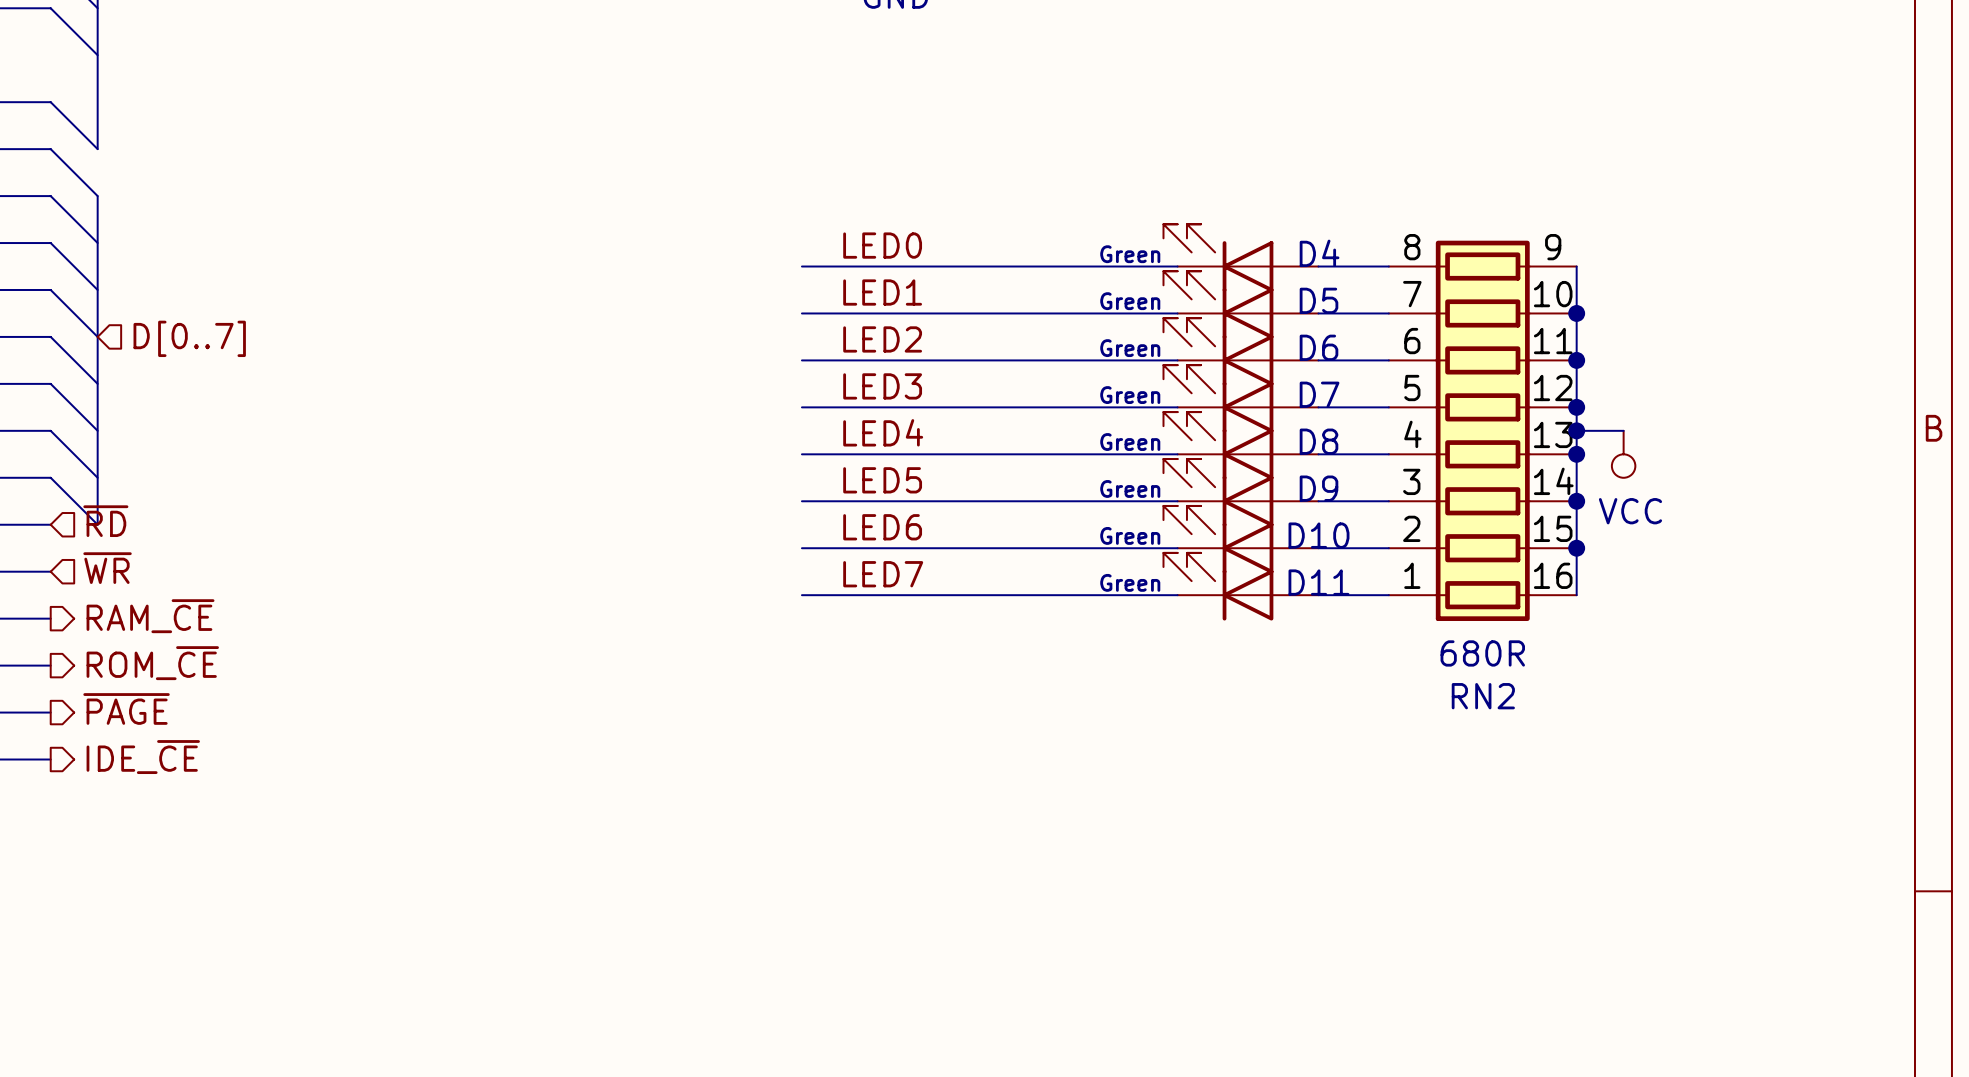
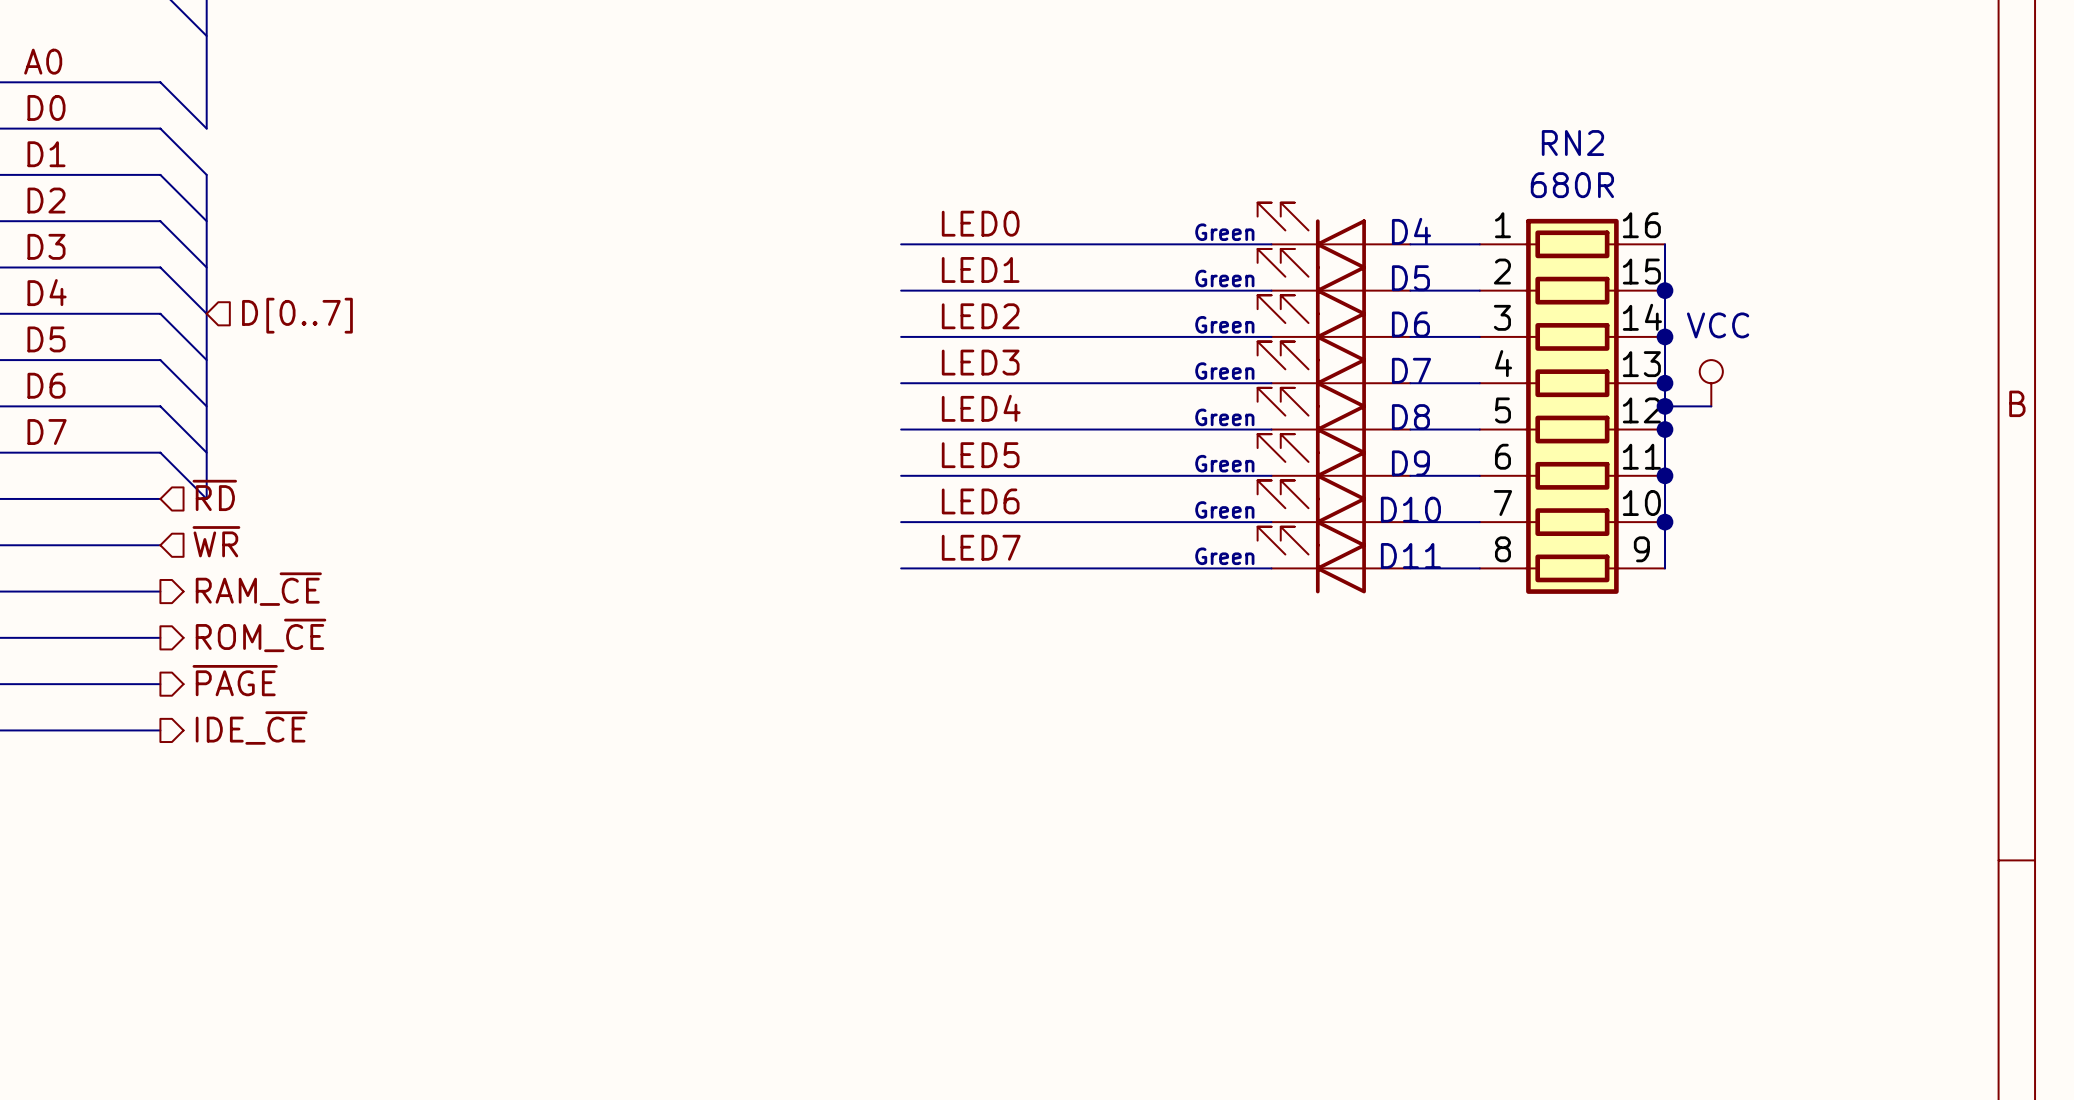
RN2 flip: as is (1482, 430) -> up-down (1572, 406)
power symbol rotation: 0° (1623, 454) -> 180° (1711, 383)
power symbol position: VCC (1623, 454) -> VCC (1711, 383)

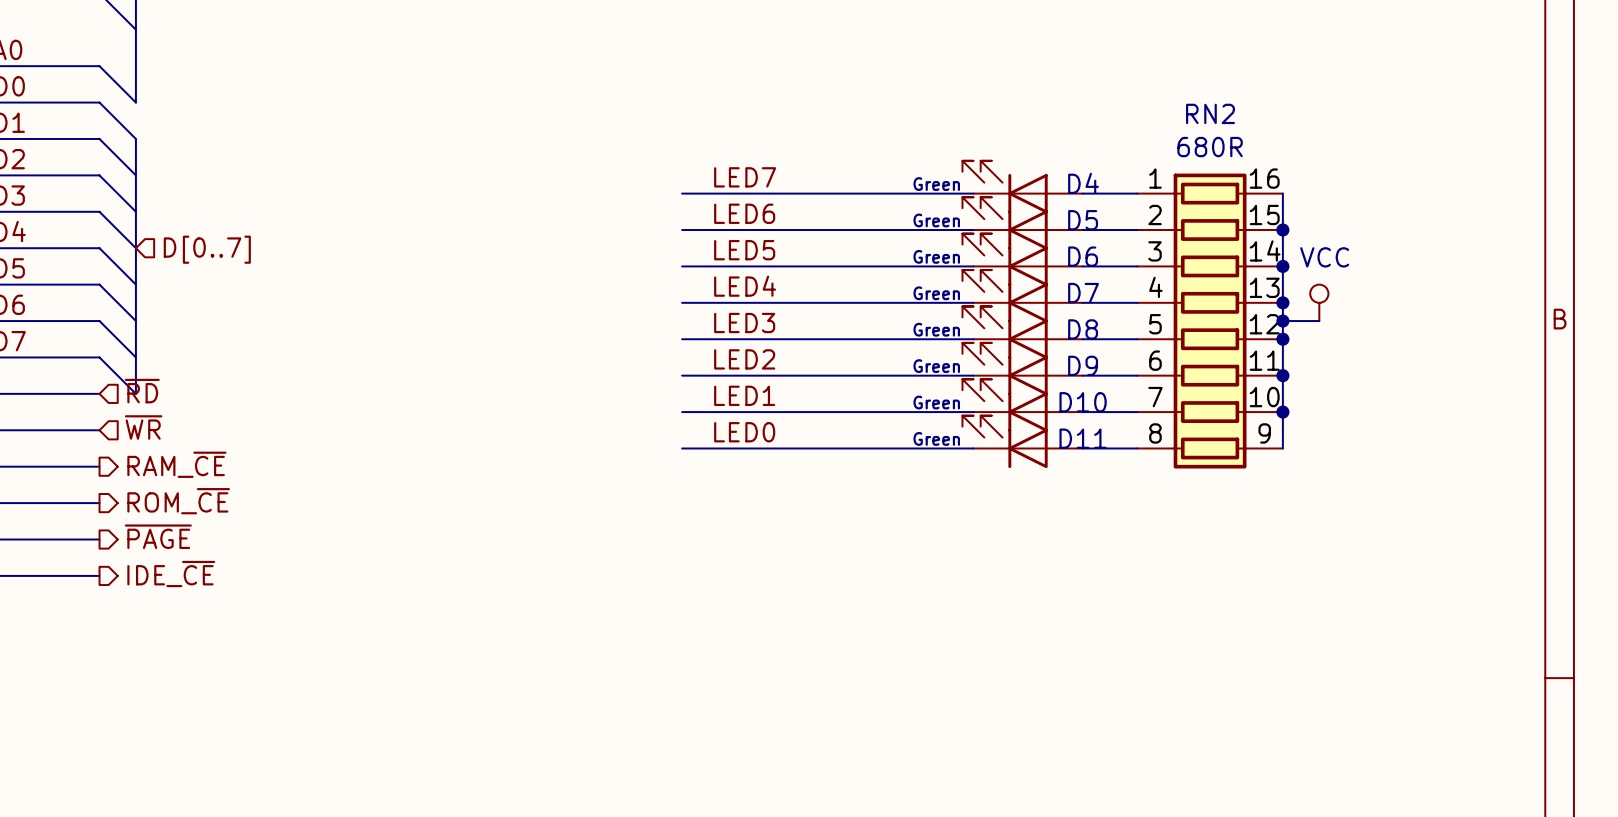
label: LED0 (980, 223) -> LED7 (745, 177)
label: LED1 (980, 269) -> LED6 (744, 213)
label: LED2 (980, 316) -> LED5 (744, 250)
label: LED3 (980, 362) -> LED4 (745, 286)
label: LED4 (981, 408) -> LED3 (744, 323)
label: LED5 (980, 455) -> LED2 (744, 359)
label: LED6 (980, 501) -> LED1 (744, 395)
label: LED7 (981, 547) -> LED0 (744, 432)

